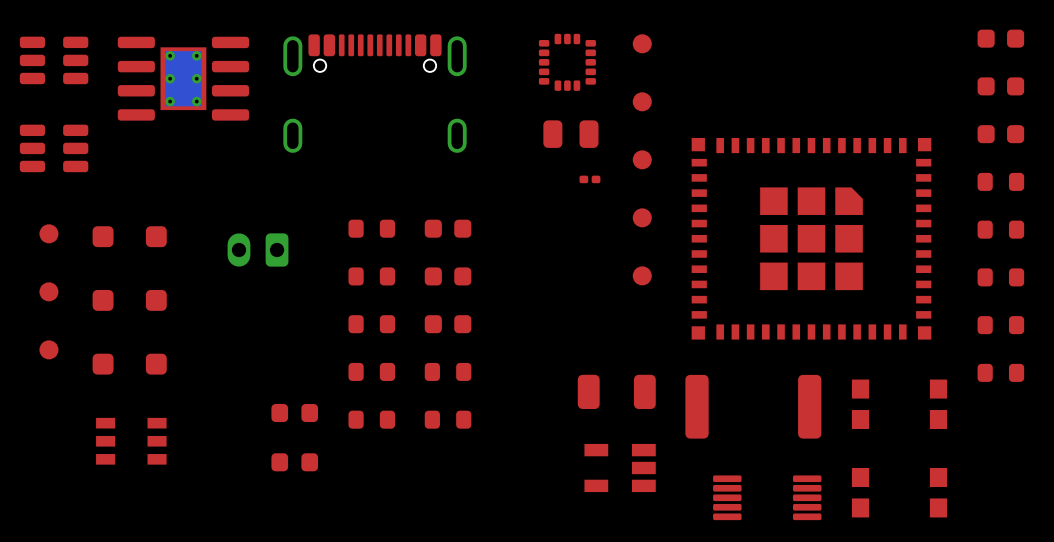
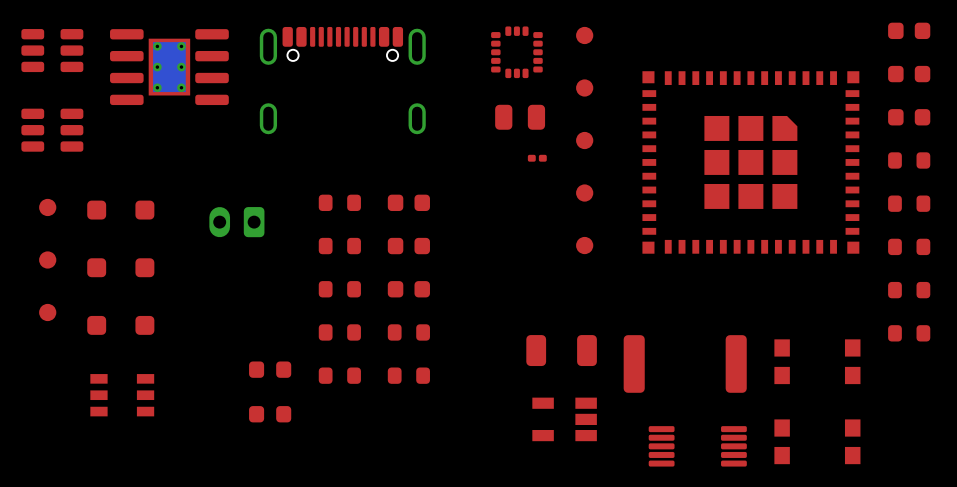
part position: (811, 238) -> (750, 162)

